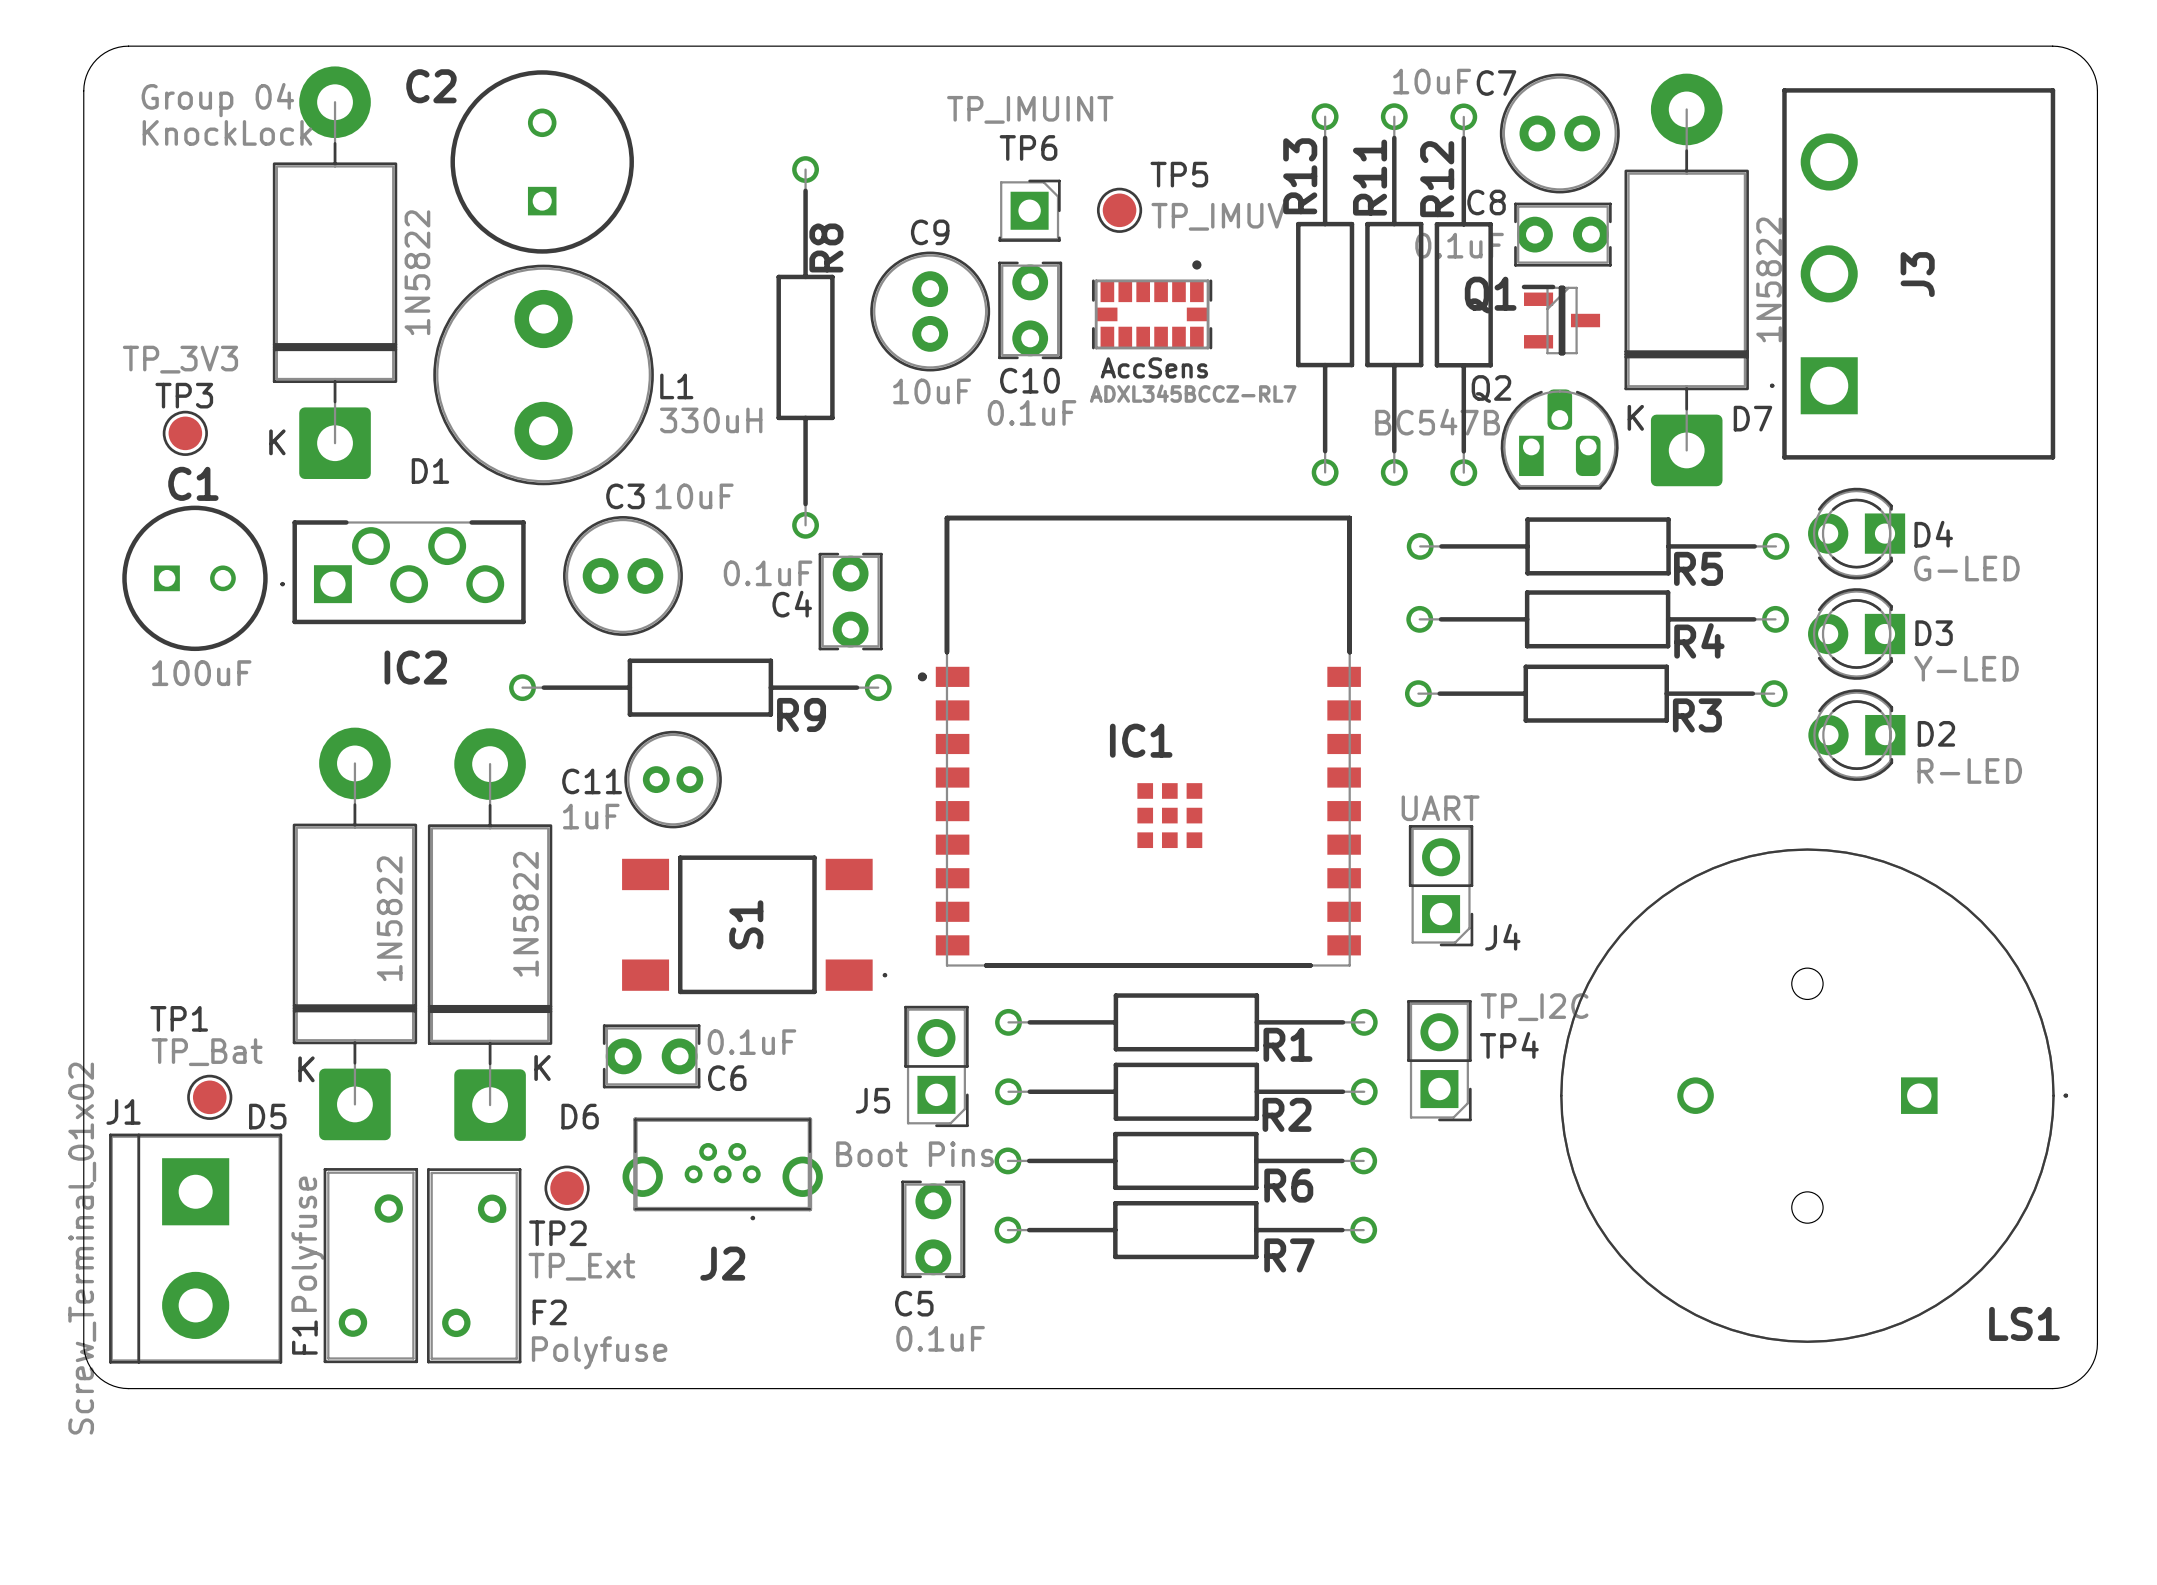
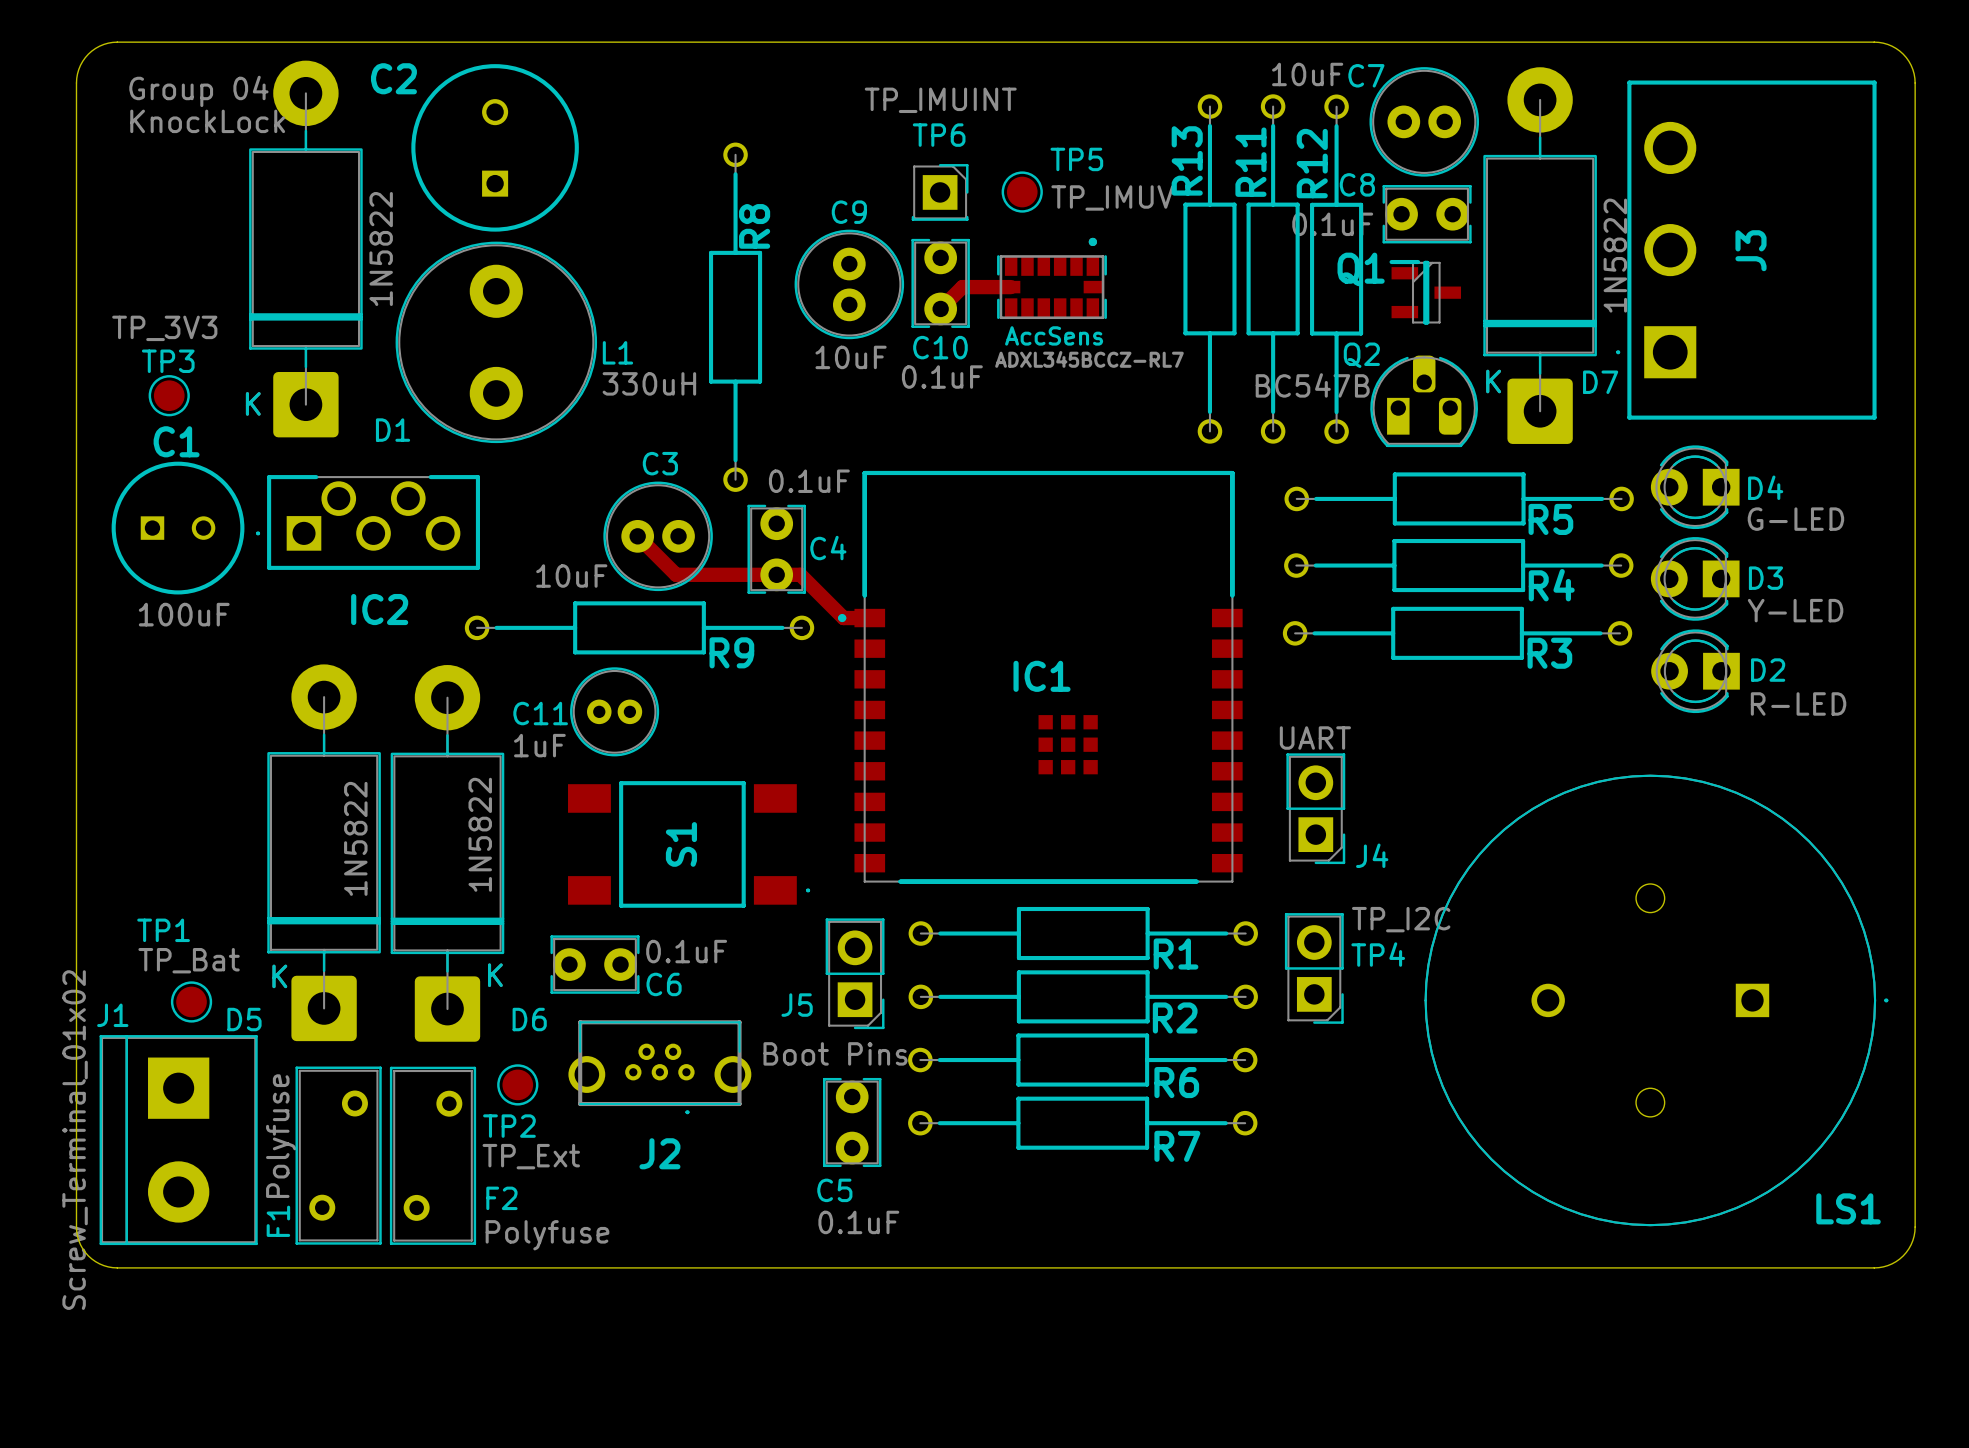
track: none -> (1010, 287) (962, 287) (940, 308)
C3 value position: 10uF (694, 496) -> 10uF (571, 576)
C4 value position: 0.1uF (768, 573) -> 0.1uF (809, 481)
C3 position: (622, 575) -> (658, 536)
track: none -> (637, 536) (676, 574) (800, 574) (843, 618) (869, 618)
C4 name position: C4 (792, 604) -> C4 (828, 548)

